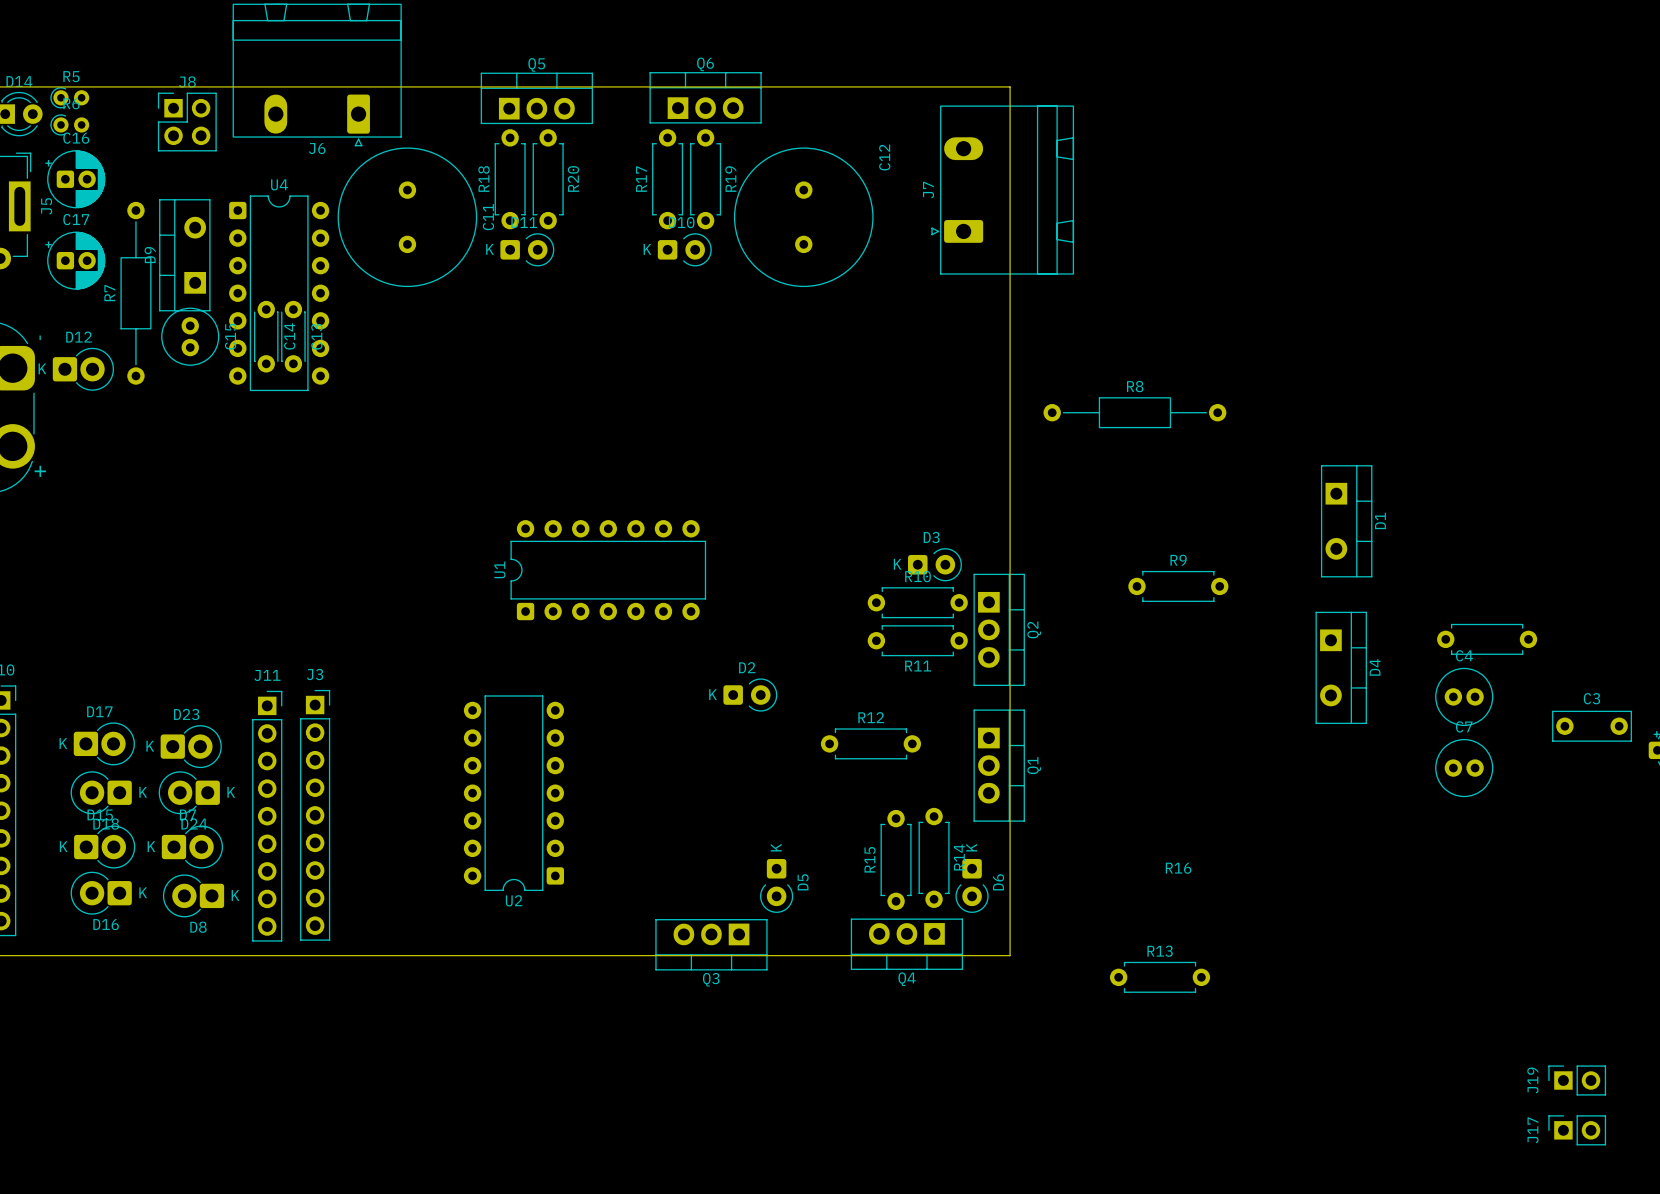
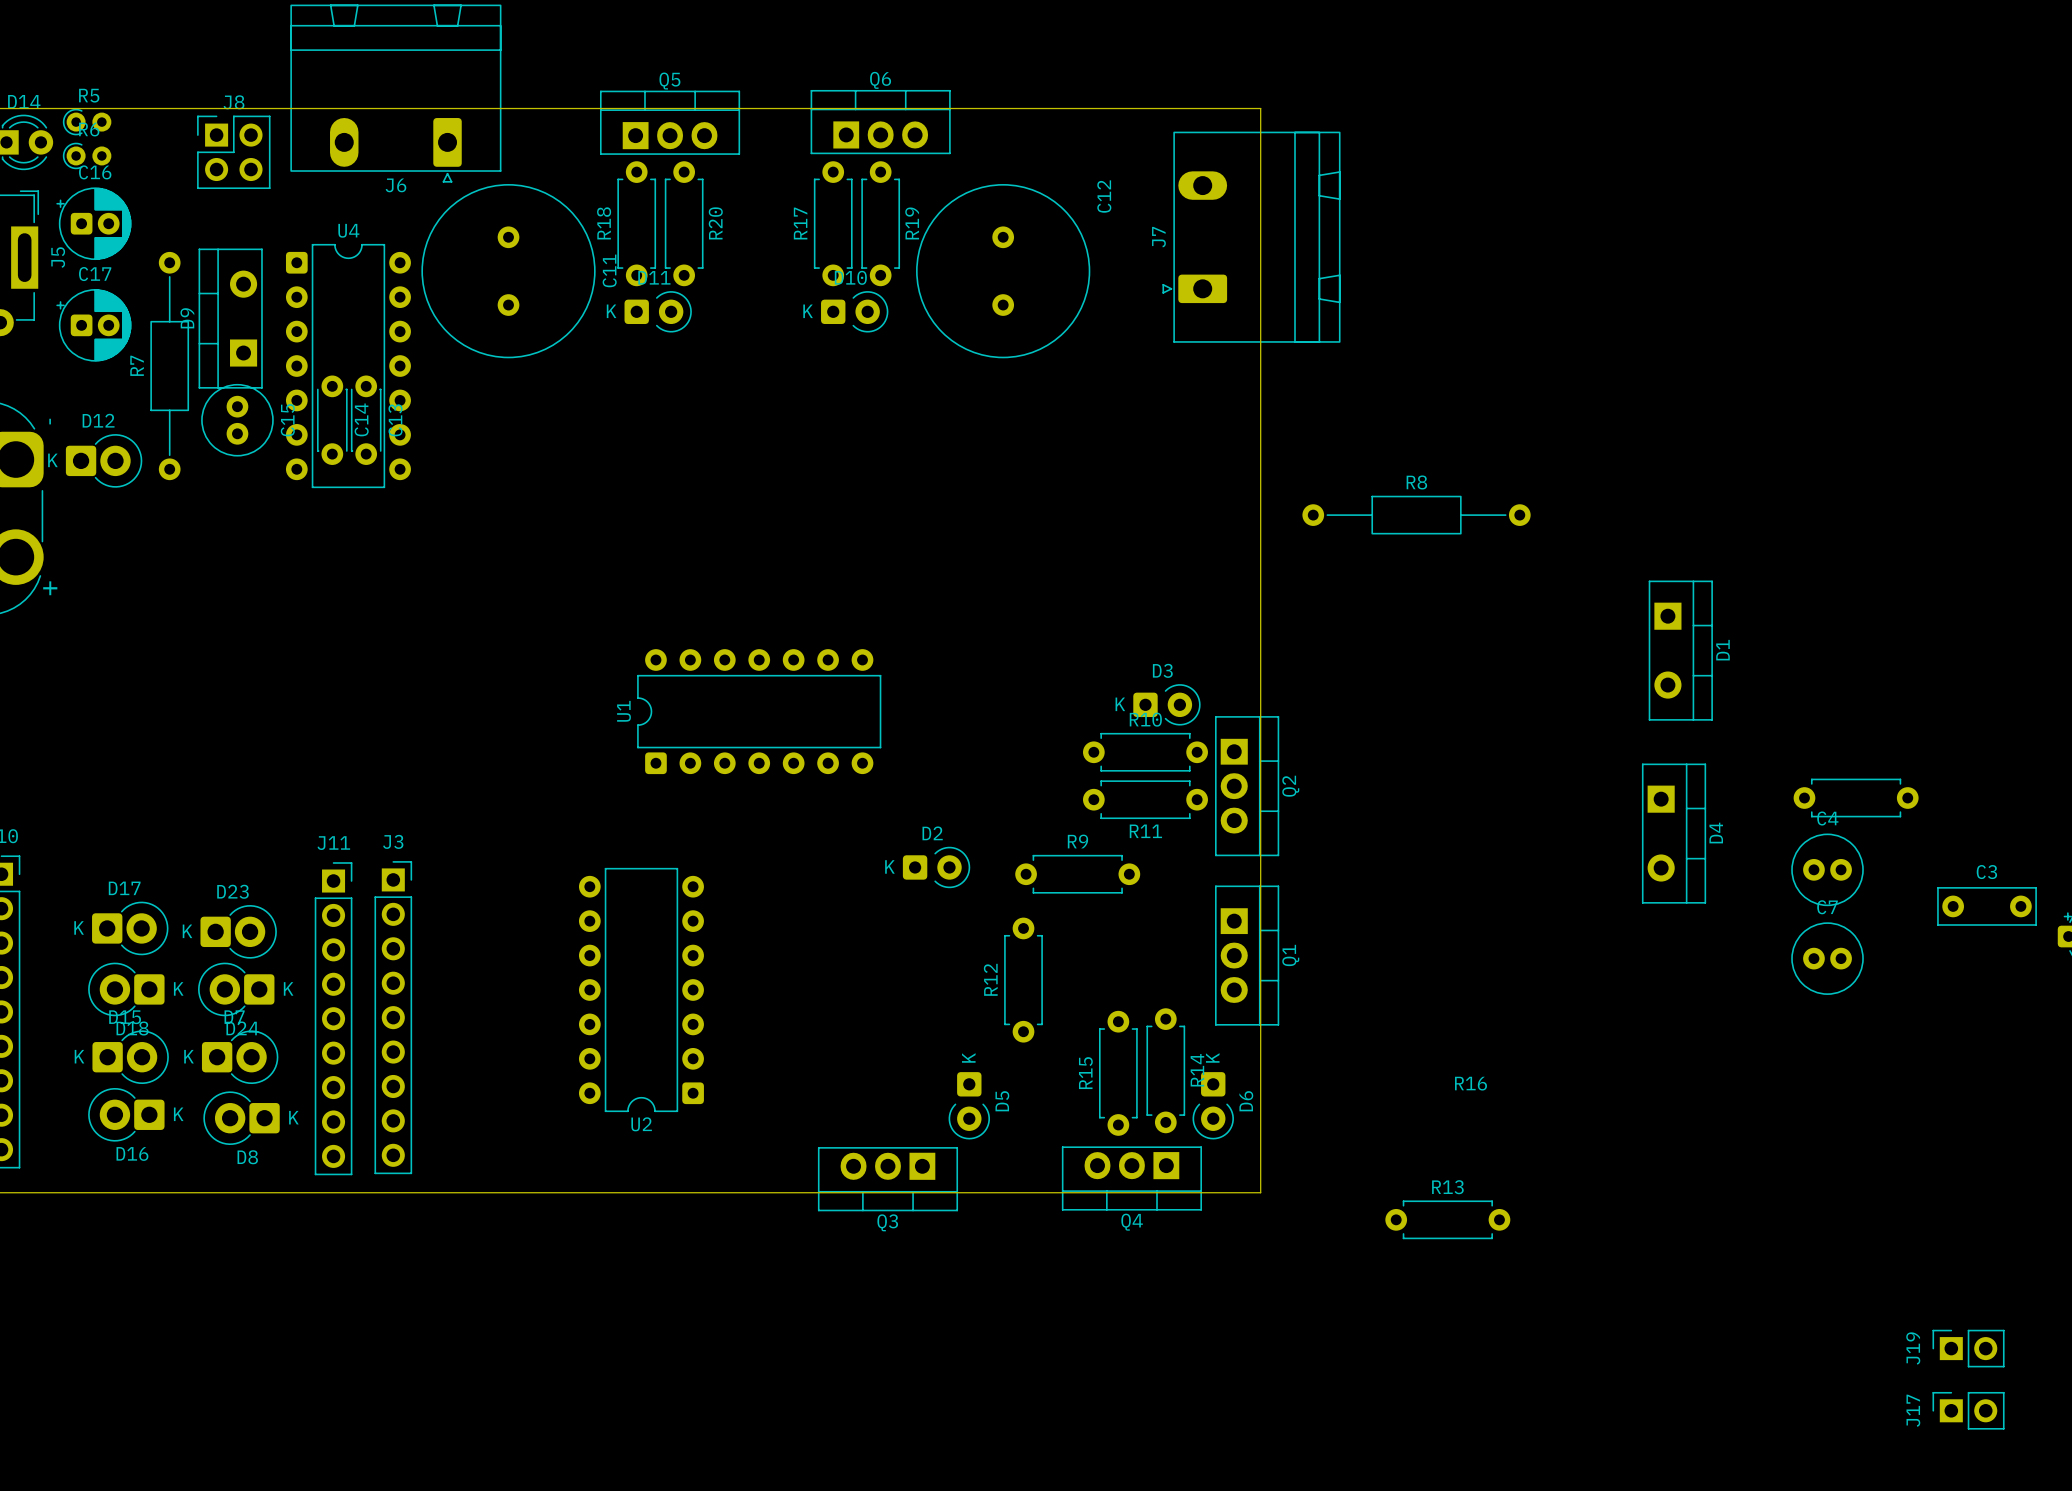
R9 position: (1178, 586) -> (1077, 874)
R12 name position: R12 (871, 717) -> R12 (990, 979)
R12 rotation: 0° (870, 743) -> 90° clockwise (1023, 980)
R12 position: (870, 743) -> (1023, 980)

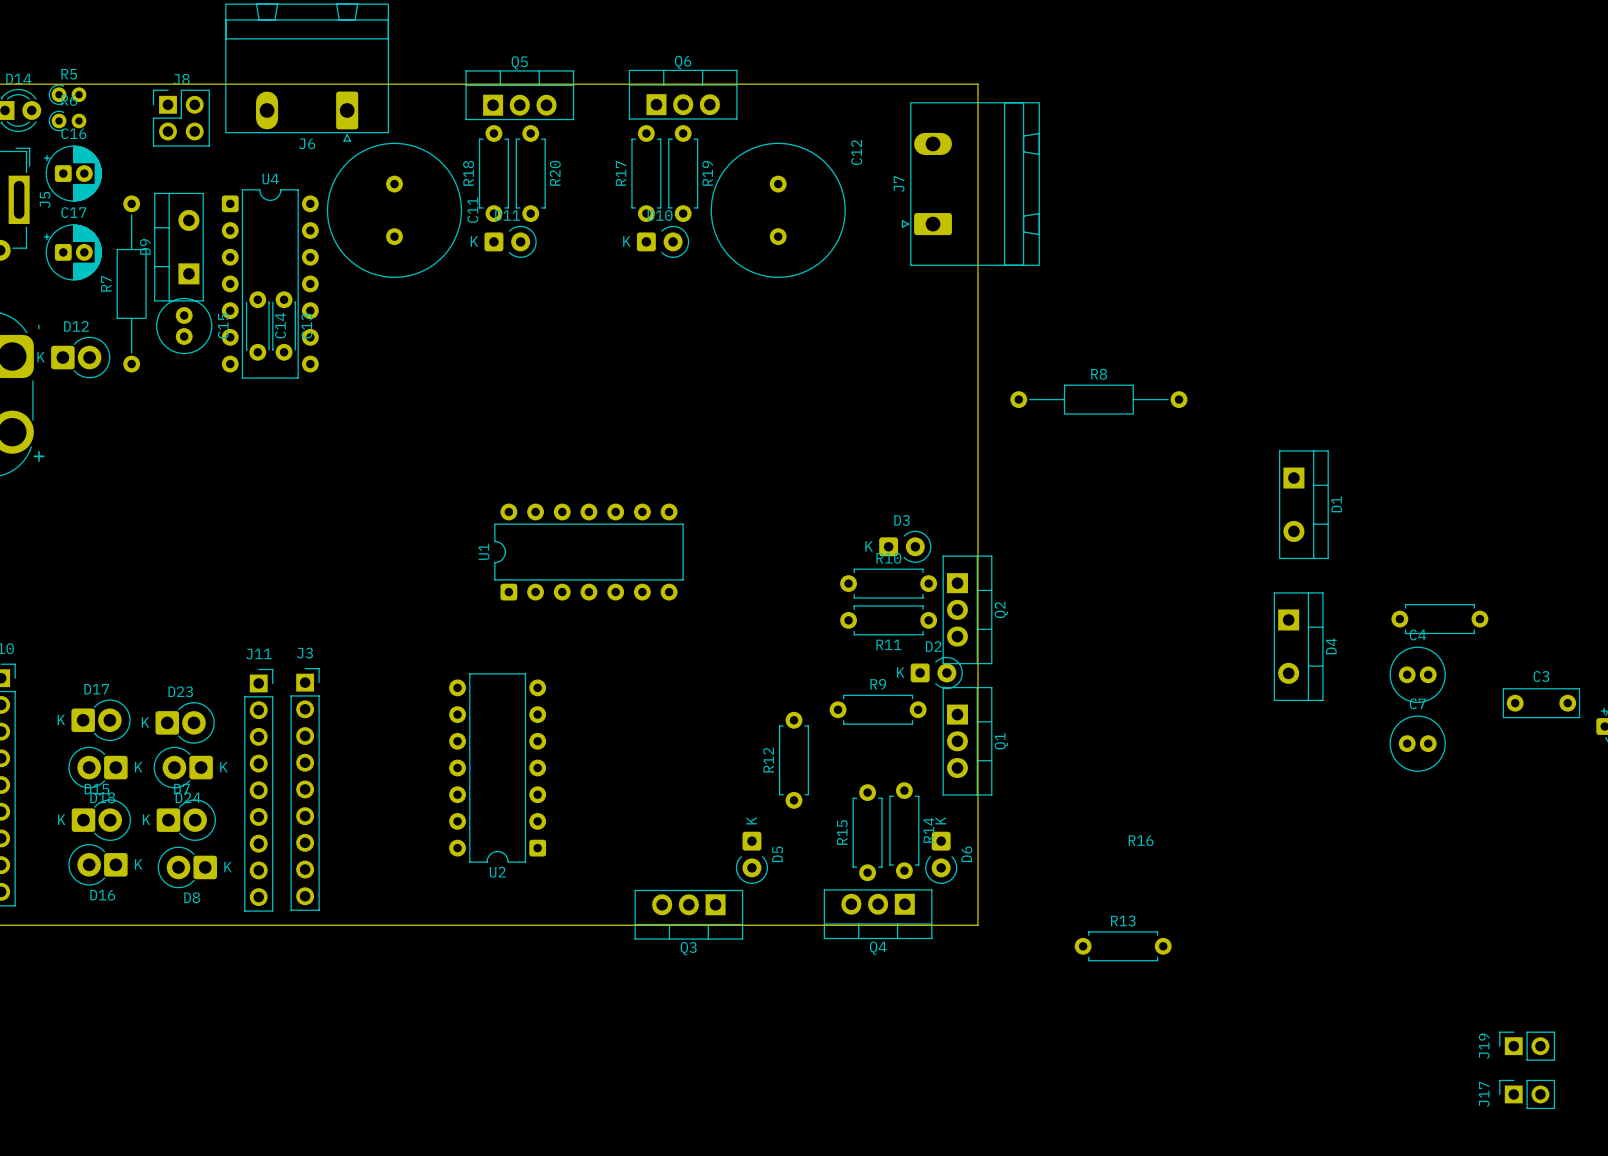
D2 position: (936, 867) -> (936, 672)
R9 position: (1077, 874) -> (878, 709)

